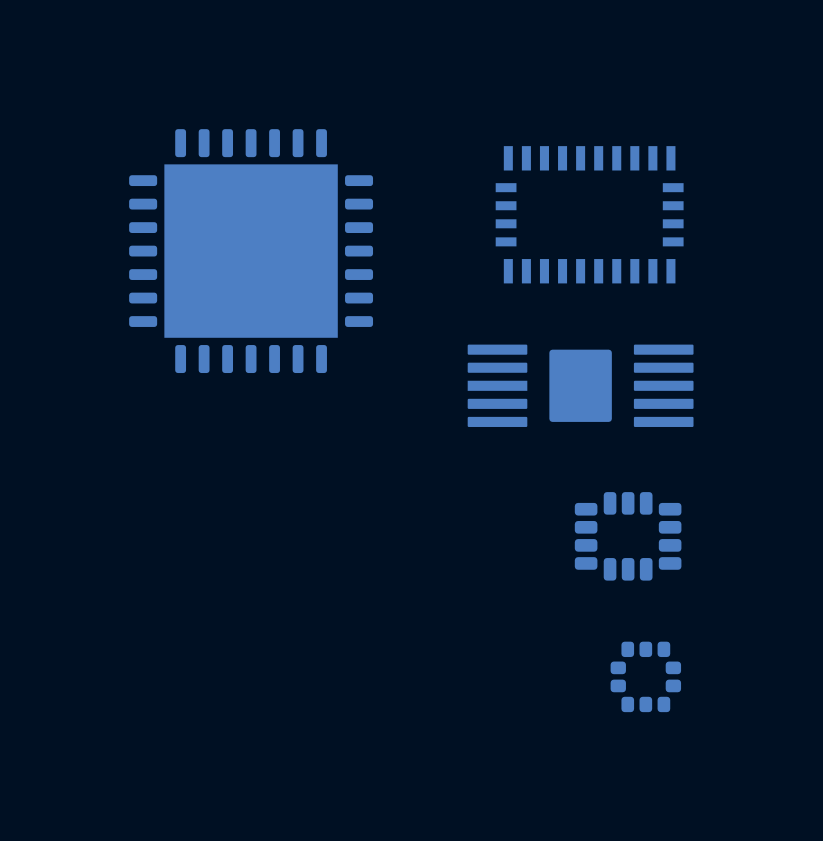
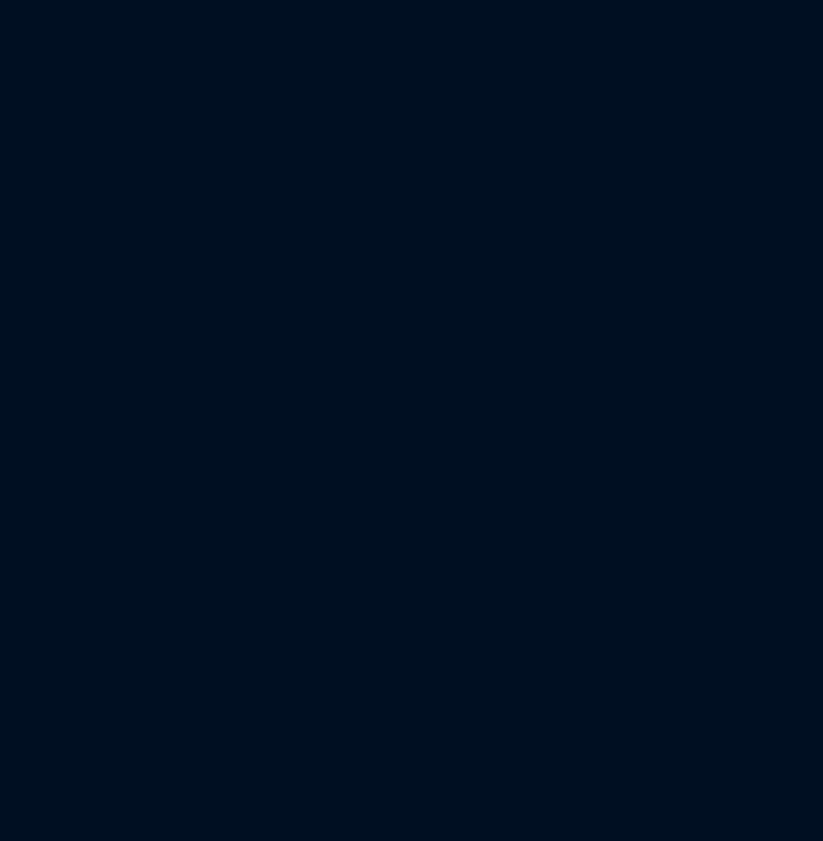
part: (589, 214) -> none
part: (251, 251) -> none
part: (580, 385) -> none
part: (628, 536) -> none
part: (645, 676) -> none

